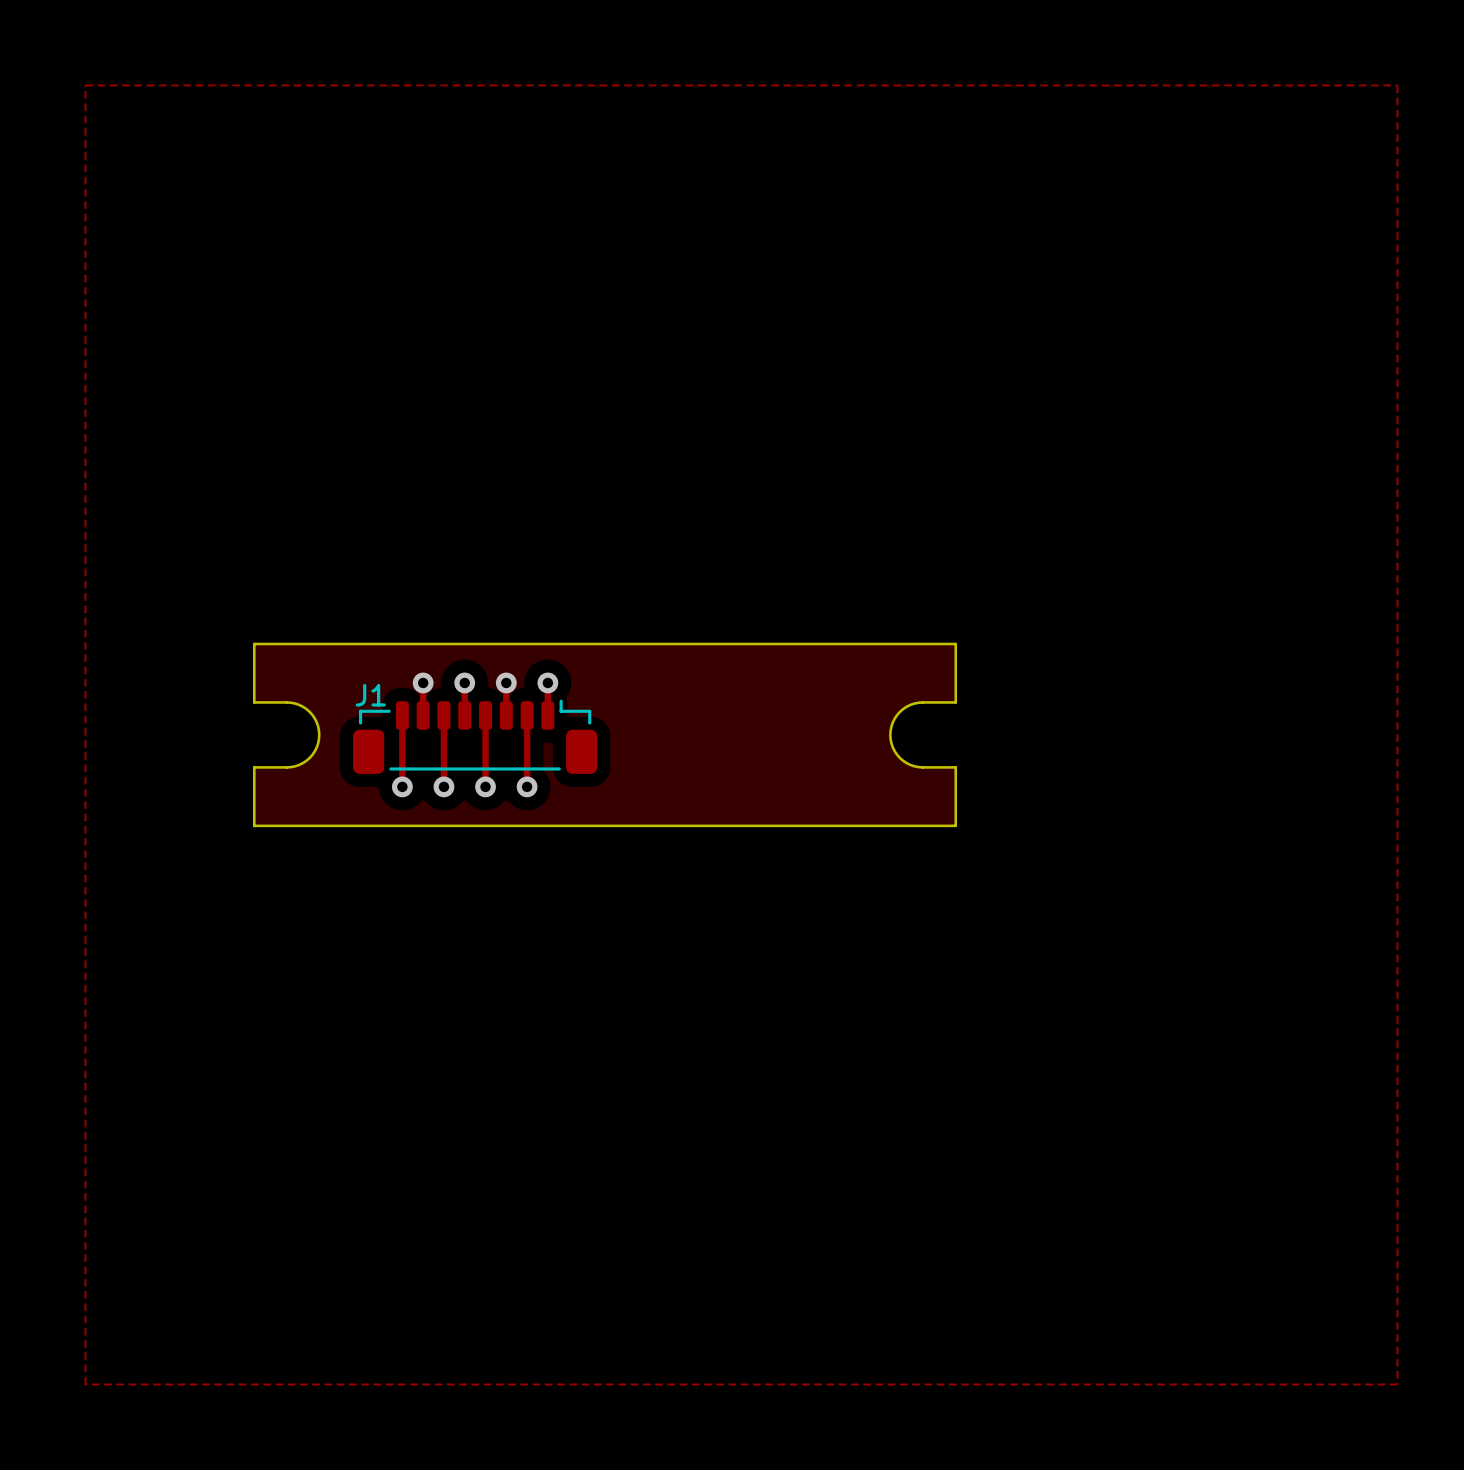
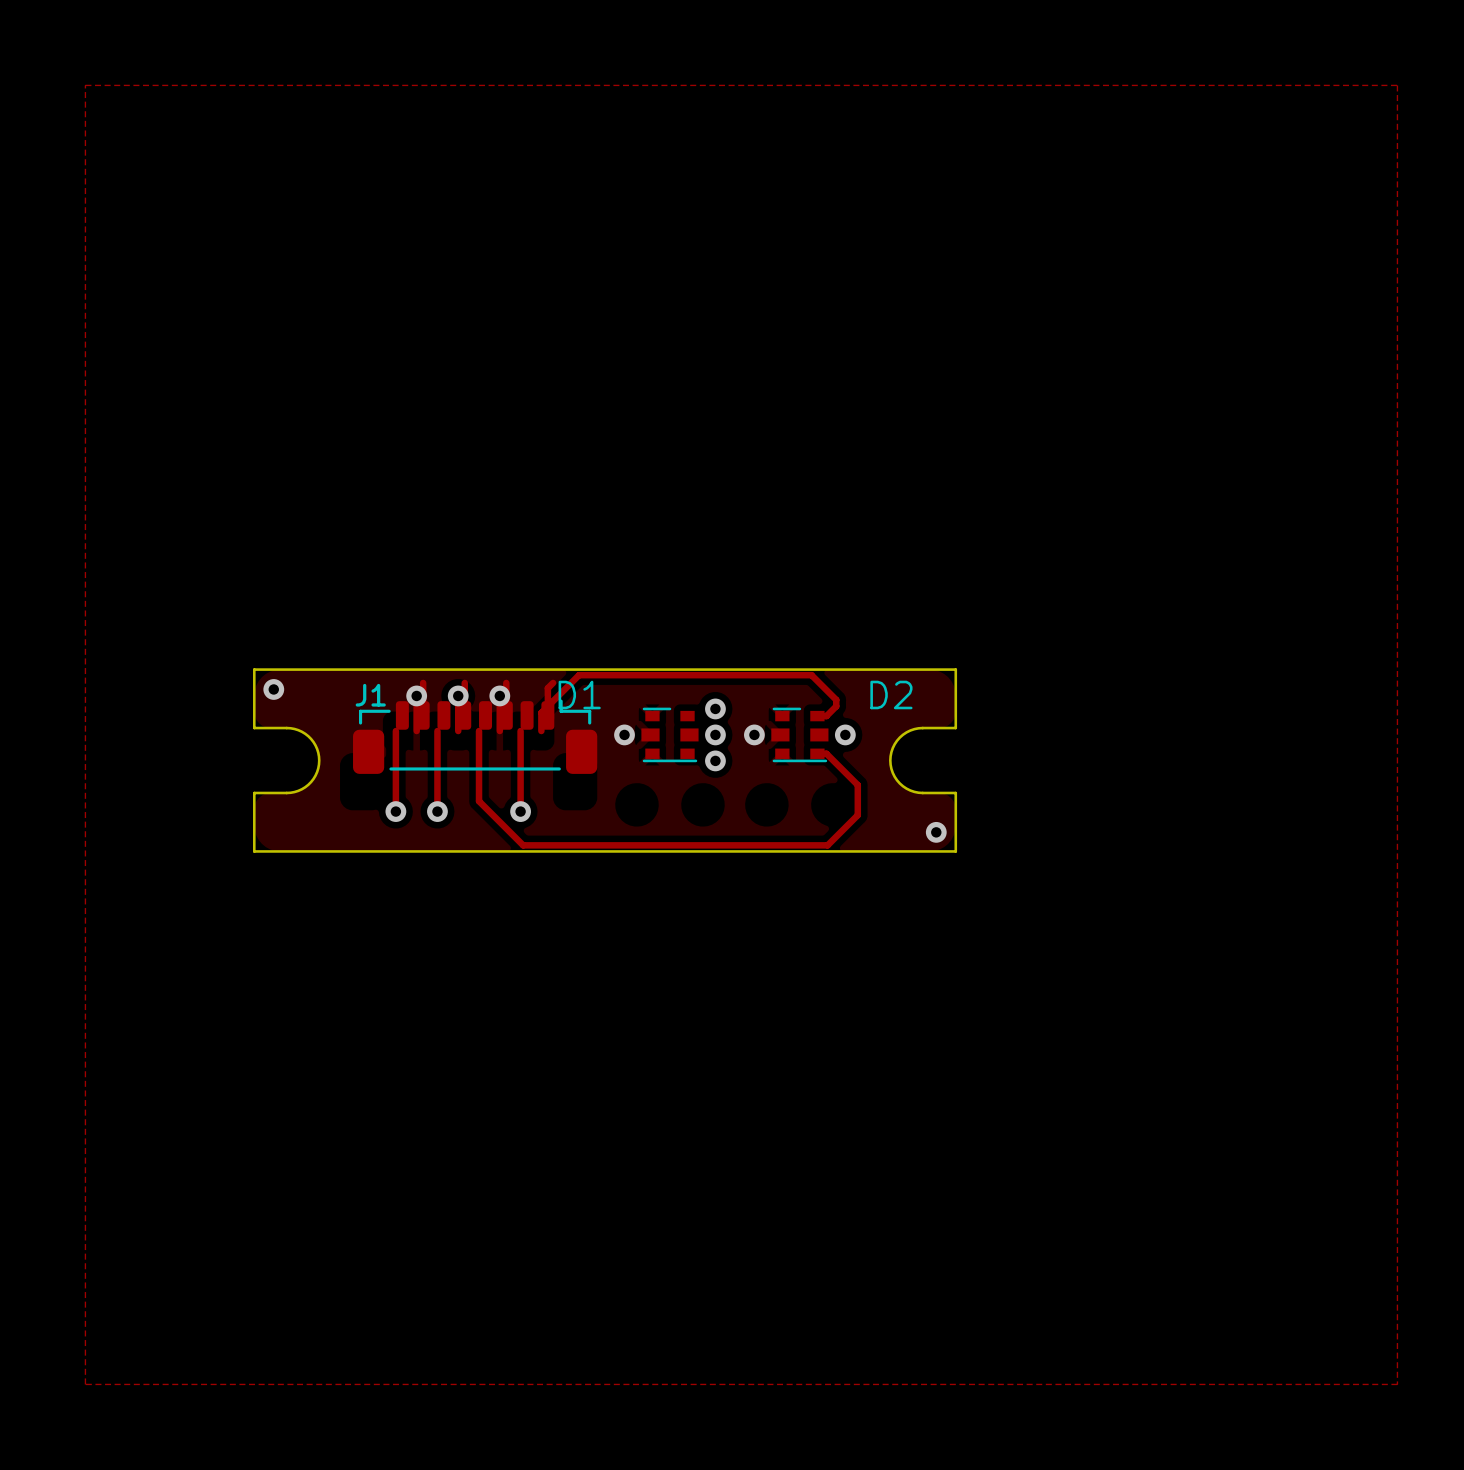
board edge: (254, 669) (254, 644) (955, 644) (955, 669) -> (254, 669) (955, 669)
via position: (423, 682) -> (416, 695)
via position: (464, 682) -> (458, 695)
via position: (506, 682) -> (499, 695)
via: (547, 682) -> none
via: none -> (273, 689)
track: none -> (416, 695) (416, 731)
track: none -> (455, 695) (458, 698) (458, 731)
track: none -> (499, 695) (499, 731)
board edge: (254, 702) (291, 702) (303, 706) (314, 718) (319, 734) (314, 751) (303, 763) (291, 767) (254, 767) (254, 792) -> (254, 702) (254, 728) (290, 728) (301, 731) (315, 745) (319, 760) (313, 778) (301, 789) (290, 792) (254, 792)
board edge: (955, 702) (918, 702) (906, 706) (894, 718) (890, 734) (894, 751) (906, 763) (918, 767) (955, 767) (955, 792) -> (955, 702) (955, 728) (918, 728) (906, 732) (894, 744) (890, 760) (894, 776) (906, 788) (918, 792) (955, 792)
via: none -> (715, 708)
track: (402, 715) (402, 786) -> none
track: (443, 715) (443, 786) -> none
track: (485, 715) (485, 786) -> none
track: (527, 715) (527, 786) -> none
track: none -> (817, 716) (826, 716) (836, 706) (836, 699) (811, 675) (579, 675) (541, 712) (541, 731)
track: none -> (395, 731) (395, 811)
track: none -> (437, 731) (437, 811)
track: none -> (479, 731) (479, 801) (523, 845) (827, 845) (857, 815) (857, 785) (826, 753) (817, 753)
track: none -> (520, 731) (520, 811)
via: none -> (624, 734)
D1: none -> (669, 734)
via: none -> (715, 734)
via: none -> (754, 734)
D2: none -> (799, 734)
via: none -> (845, 734)
via: none -> (715, 760)
via: (402, 786) -> none
via: (443, 786) -> none
via: (485, 786) -> none
via: (527, 786) -> none
via: none -> (395, 811)
via: none -> (437, 811)
via: none -> (520, 811)
board edge: (254, 825) (955, 825) -> (254, 825) (254, 851) (955, 851) (955, 825)
via: none -> (936, 832)

